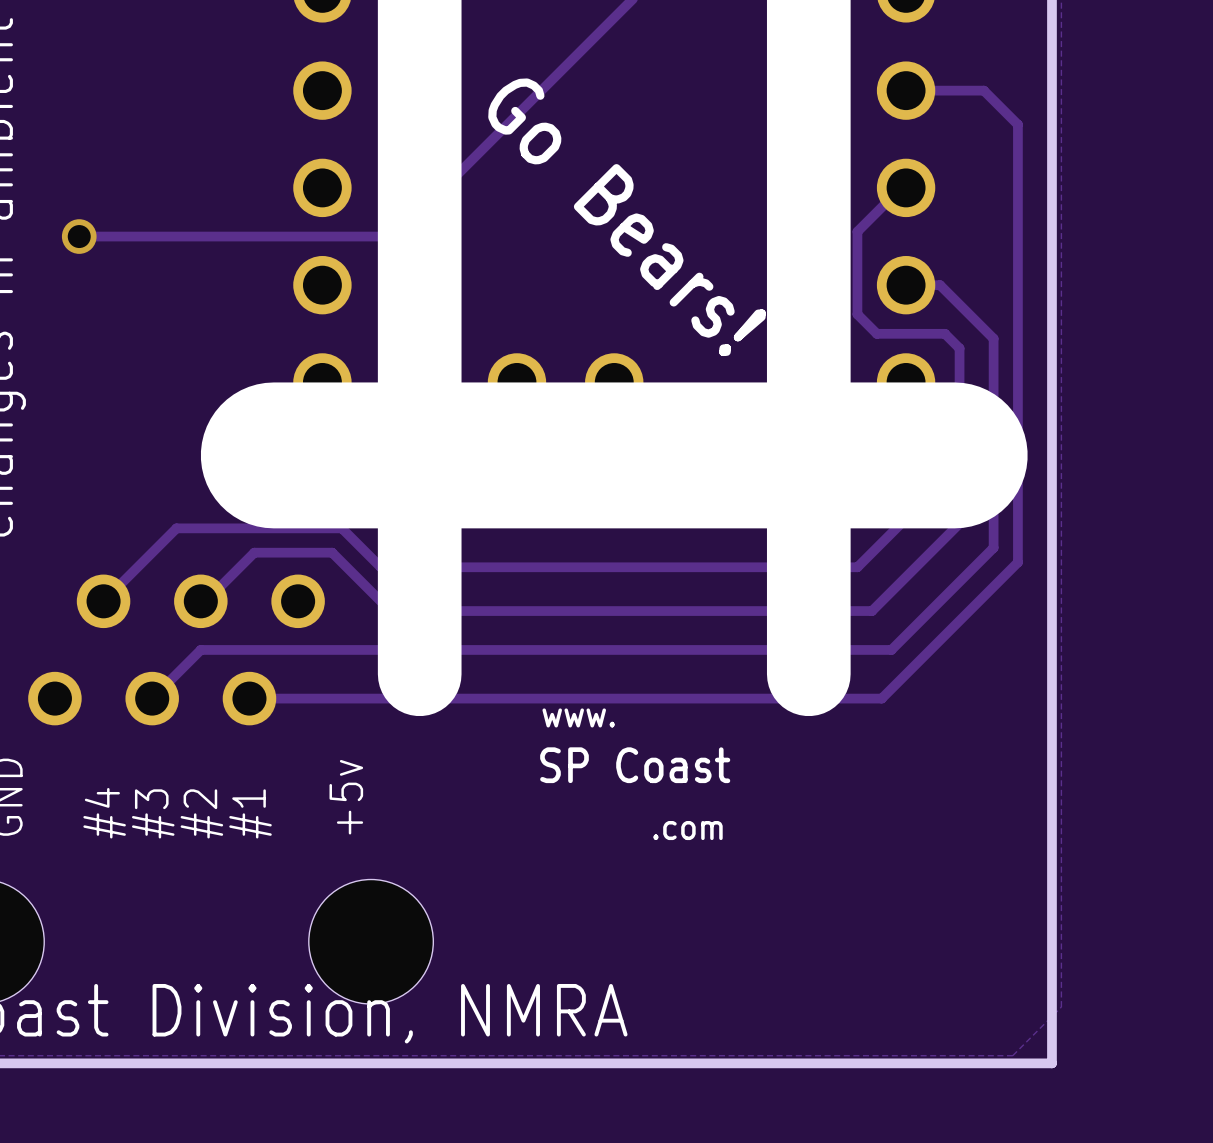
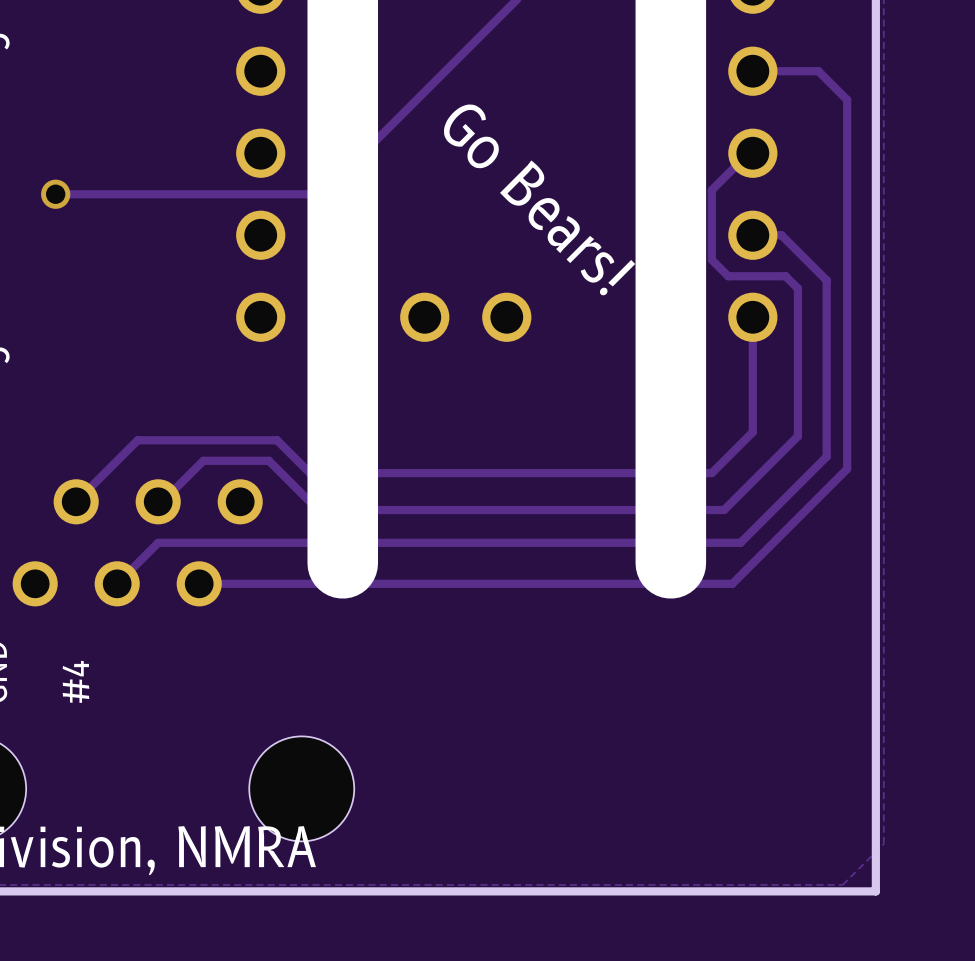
line: (954, 455) (273, 455) -> none
text: www. (578, 717) -> none
text: SP Coast (635, 765) -> none
text: +5v (346, 797) -> none
text: #3 (153, 813) -> none
text: #2 (201, 813) -> none
text: #1 (250, 813) -> none
text: .com (687, 830) -> none

